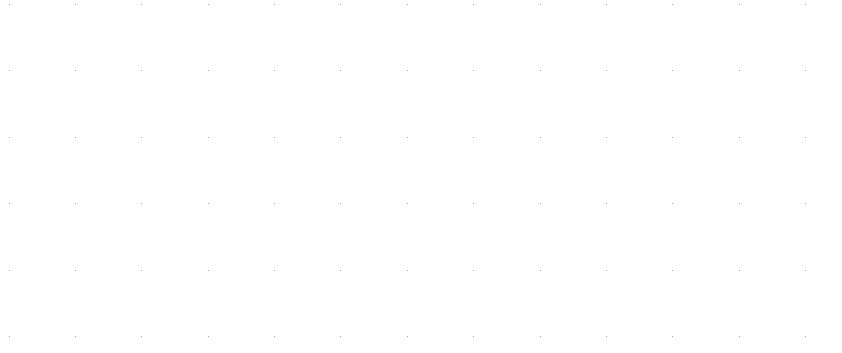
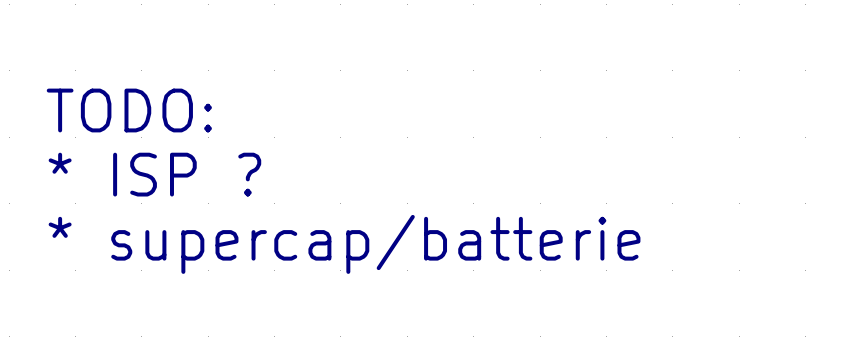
text: none -> TODO: (129, 110)
text: none -> * ISP ? (154, 174)
text: none -> * supercap/batterie (344, 244)

